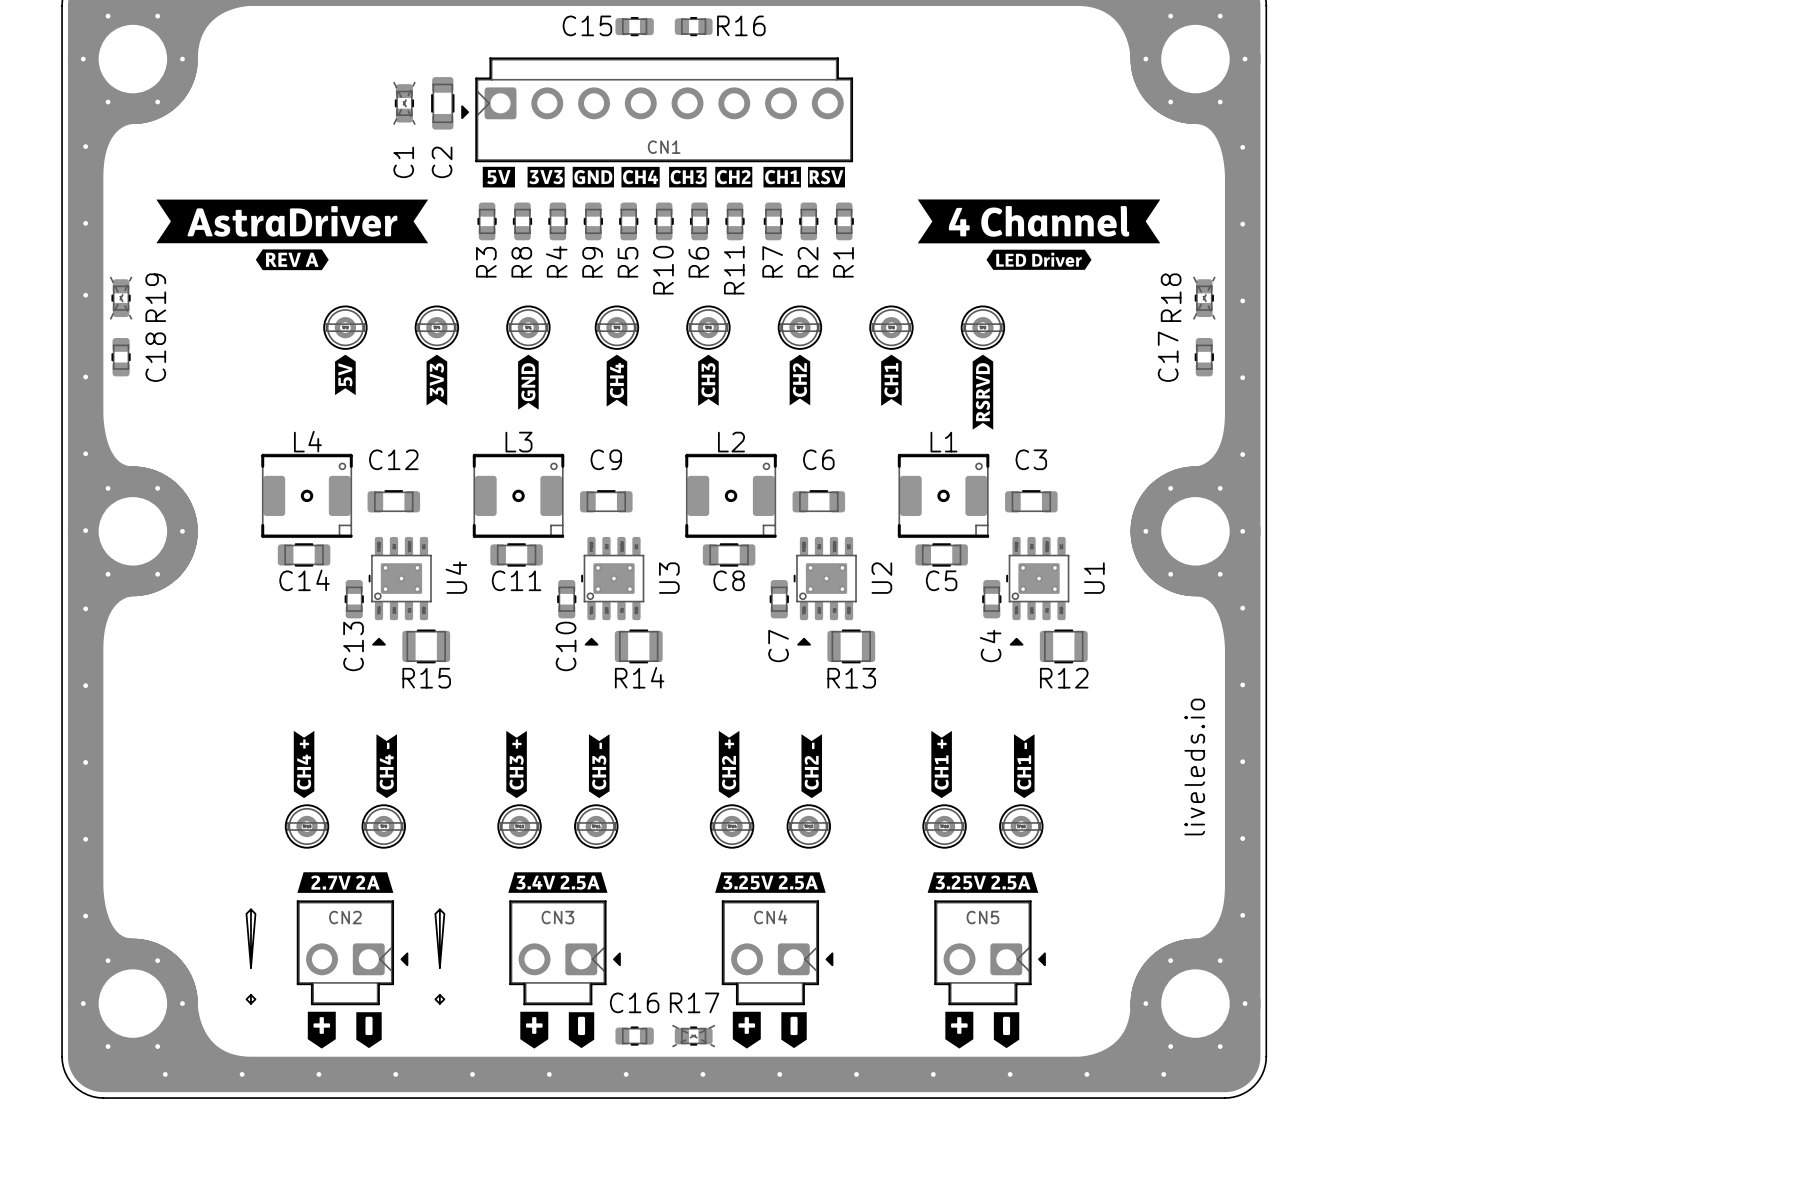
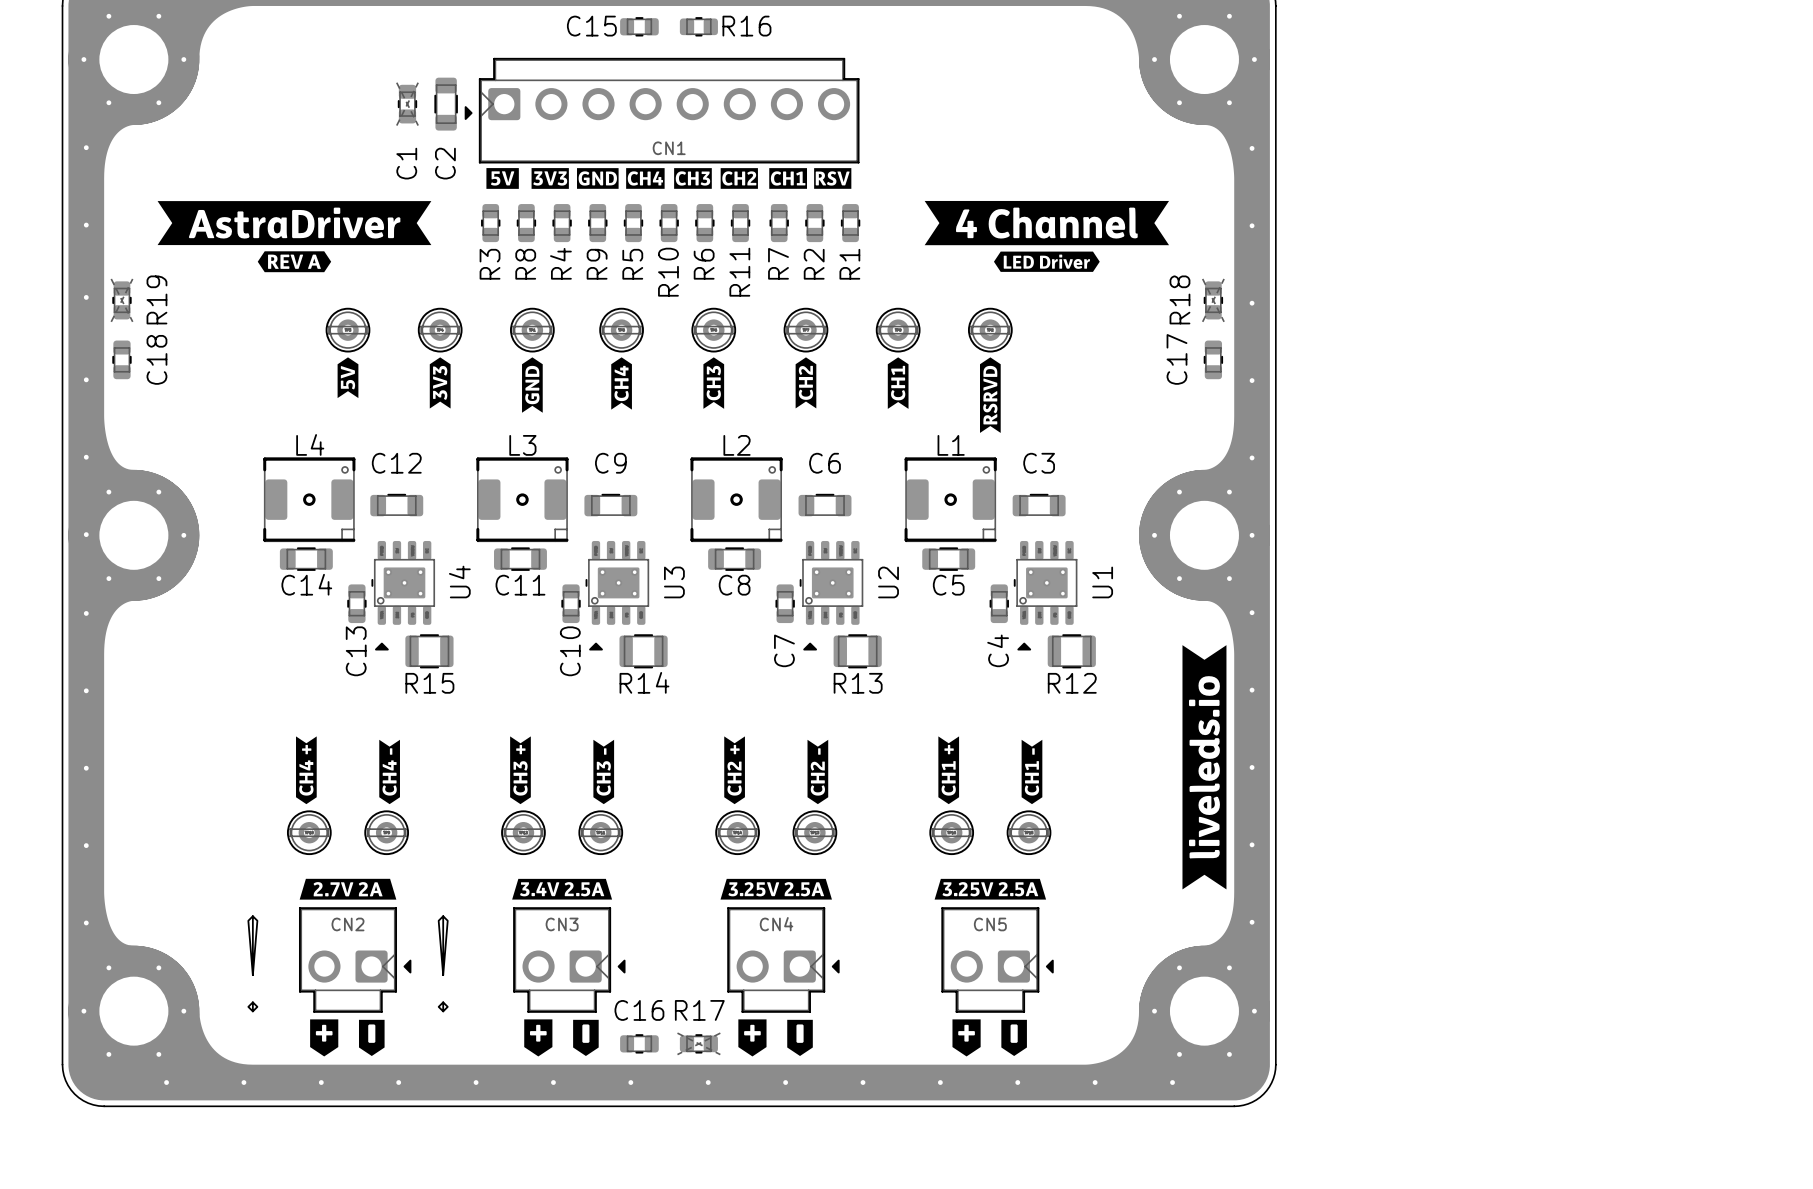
drawing: none -> [1182, 645, 1227, 890]
text: liveleds.io (1194, 767) -> none

